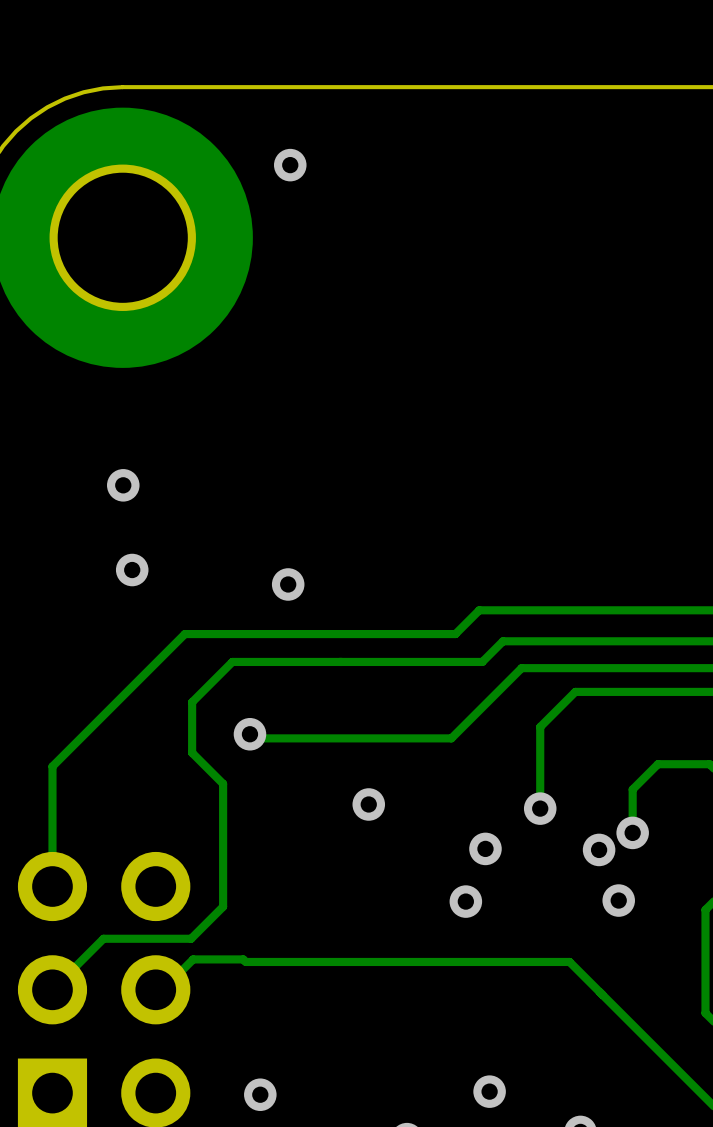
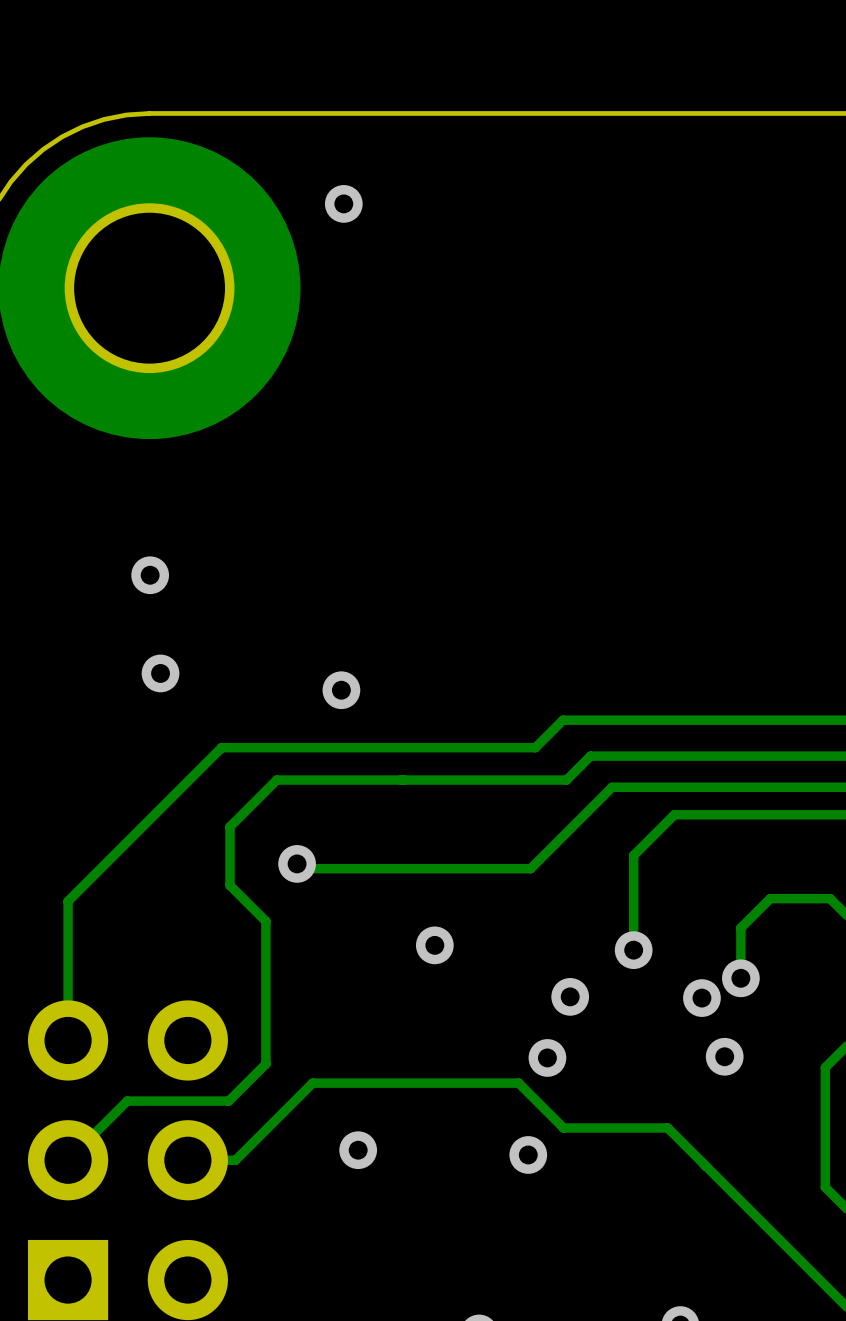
track: (479, 961) (245, 961) (243, 959) (193, 959) (162, 989) -> (563, 1127) (518, 1083) (312, 1083) (235, 1160) (195, 1160)
via: none -> (358, 1150)
via: none -> (528, 1154)
via: (489, 1091) -> none
via: (260, 1094) -> none

